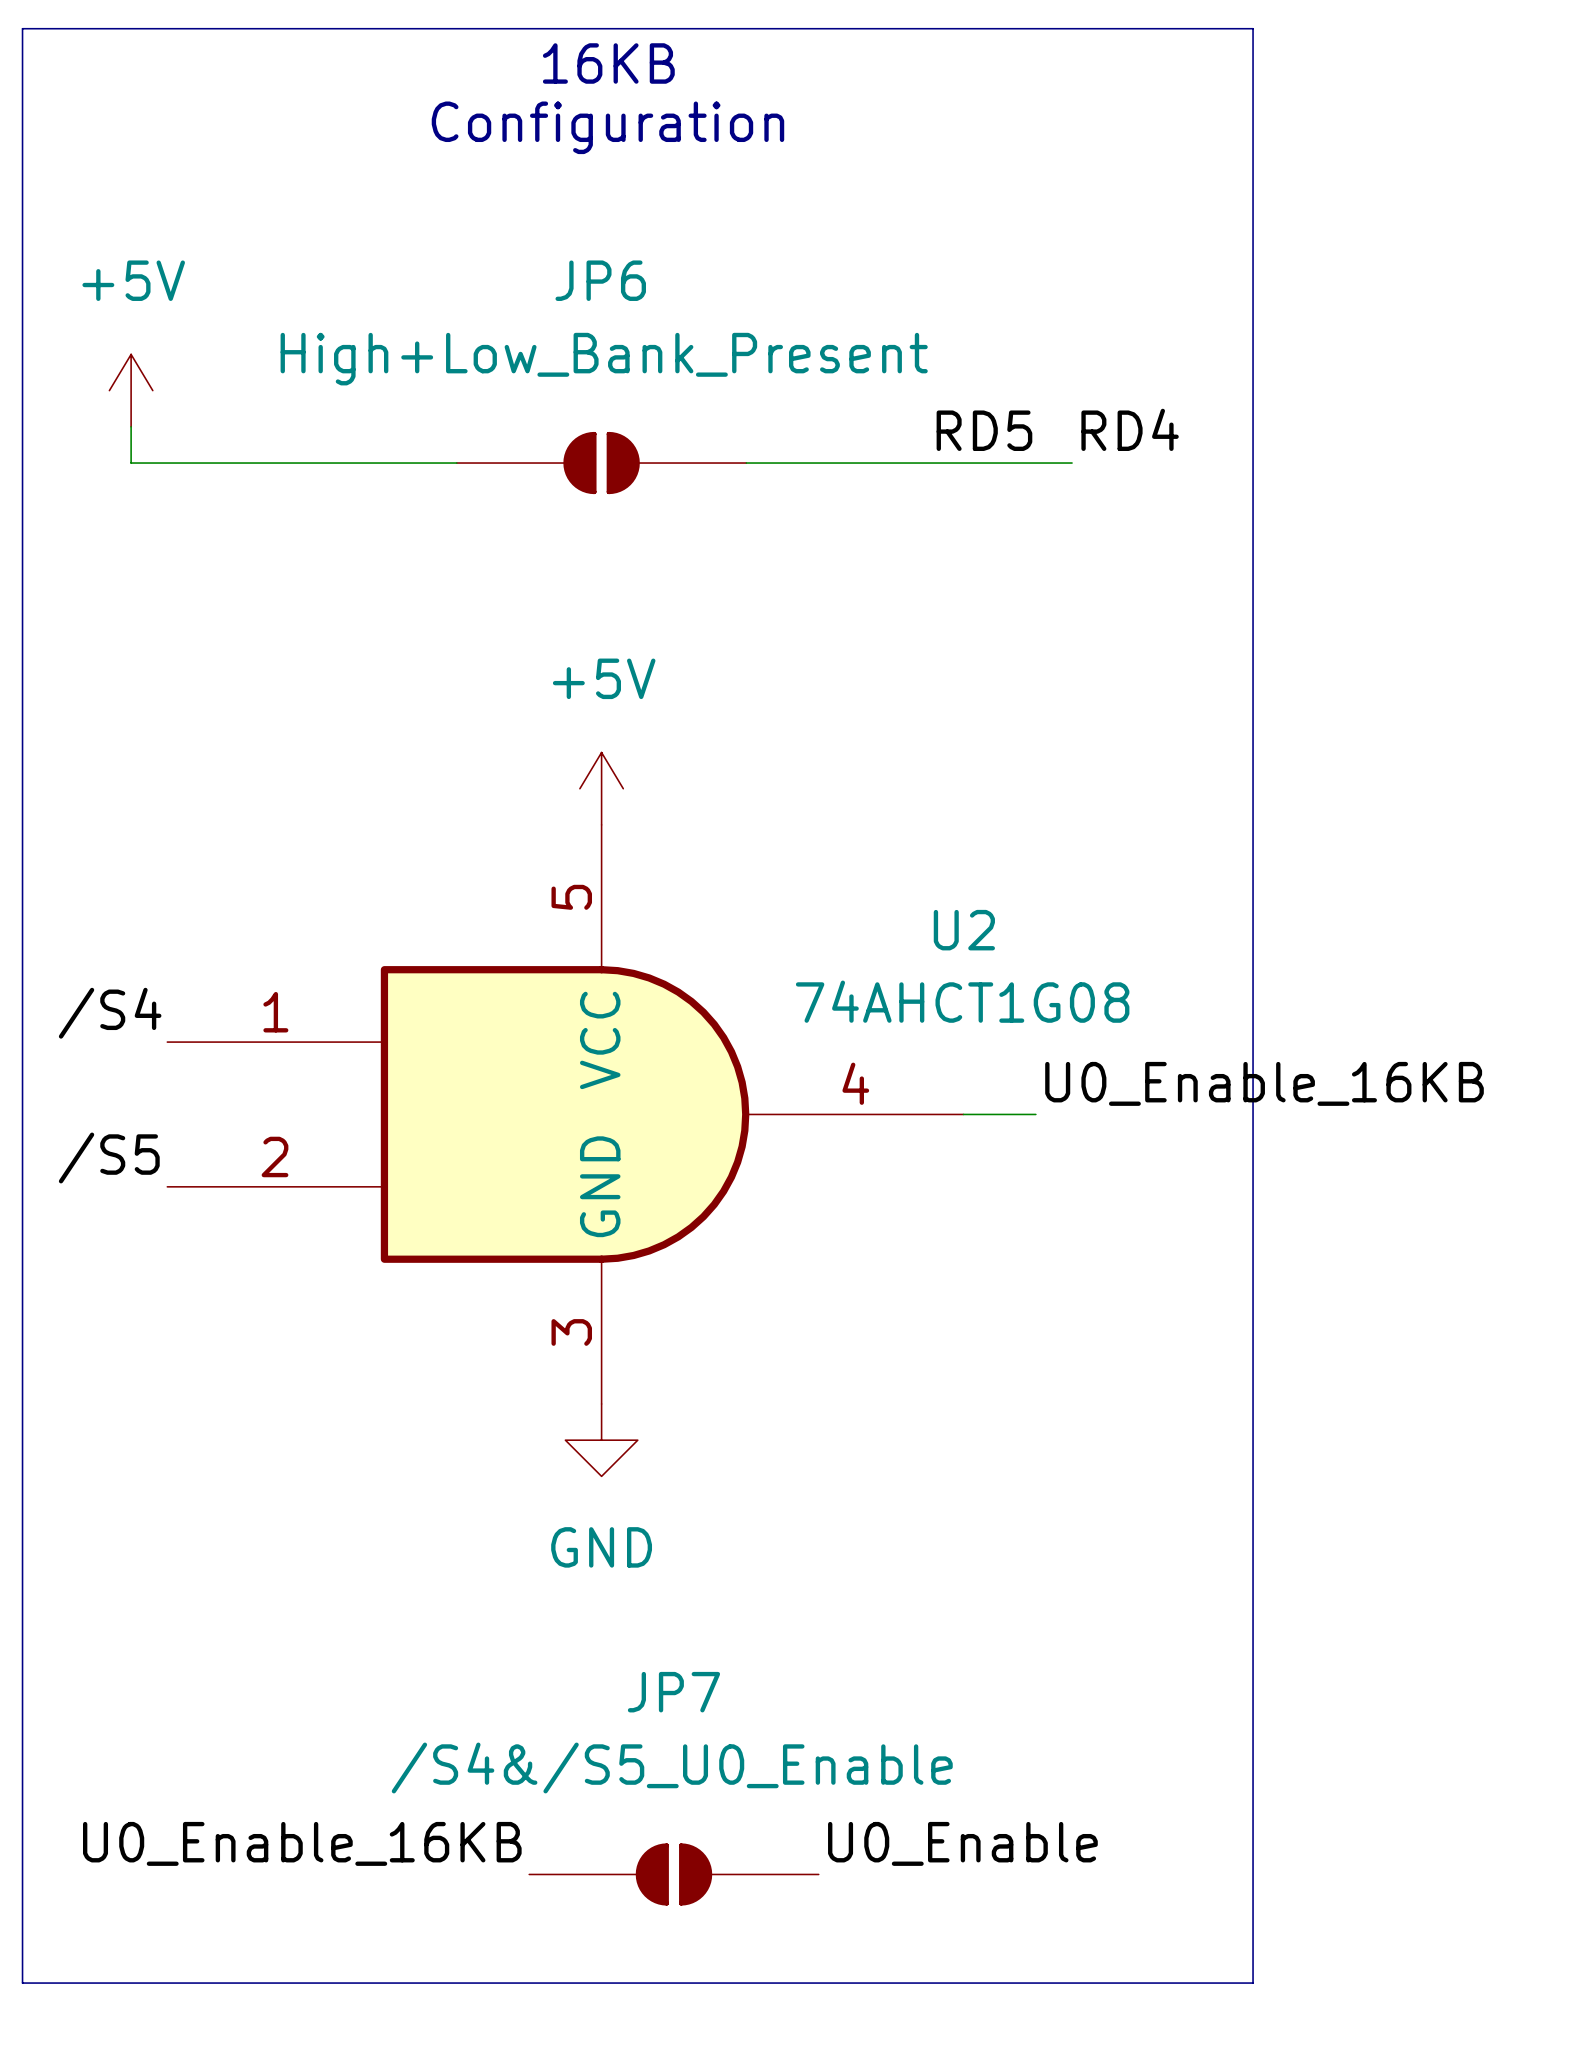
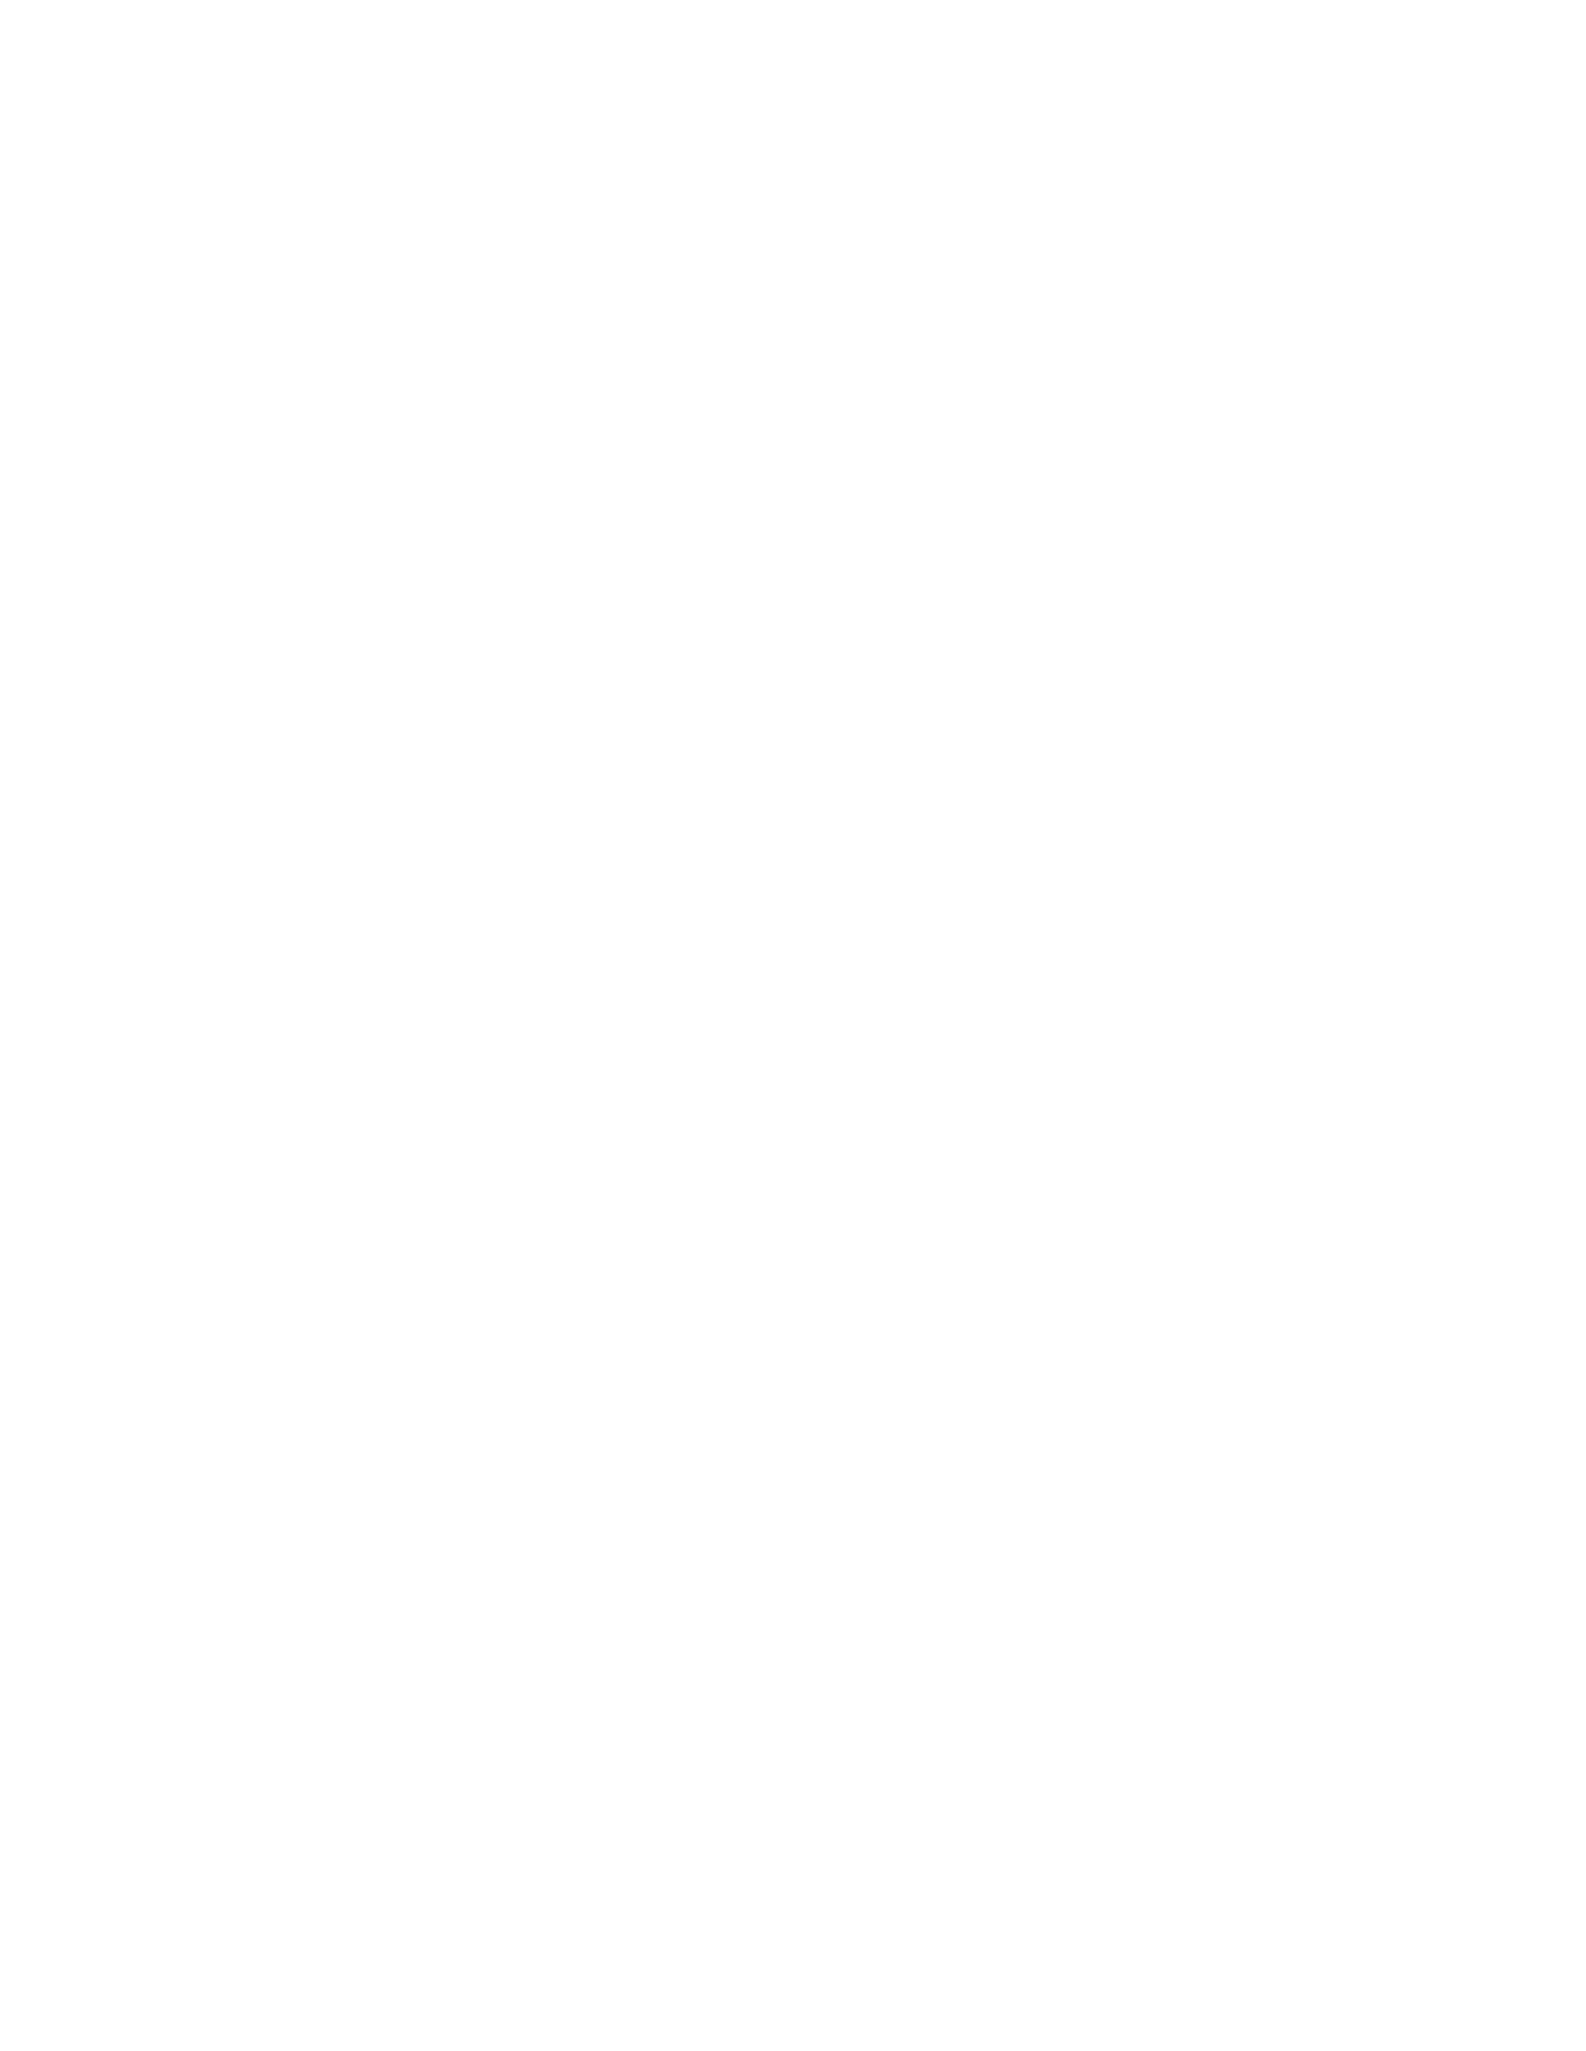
line: (22, 28) (1253, 28) (1253, 1983) (22, 1983) (22, 28) -> none
text: 16KB (608, 63) -> none
text: Configuration (607, 127) -> none
power symbol: +5V (131, 390) -> none
wire: (131, 426) (131, 463) (456, 463) -> none
label: RD4 (1130, 429) -> none
label: RD5 (984, 430) -> none
JP6: High+Low_Bank_Present (601, 463) -> none
wire: (746, 463) (1072, 463) -> none
power symbol: +5V (601, 788) -> none
label: /S4 (110, 1013) -> none
label: U0_Enable_16KB (1264, 1083) -> none
U2: 74AHCT1G08 (565, 1114) -> none
wire: (963, 1114) (1035, 1114) -> none
label: /S5 (109, 1157) -> none
power symbol: GND (601, 1440) -> none
label: U0_Enable_16KB (302, 1843) -> none
label: U0_Enable (962, 1843) -> none
JP7: /S4&/S5_U0_Enable (673, 1874) -> none

